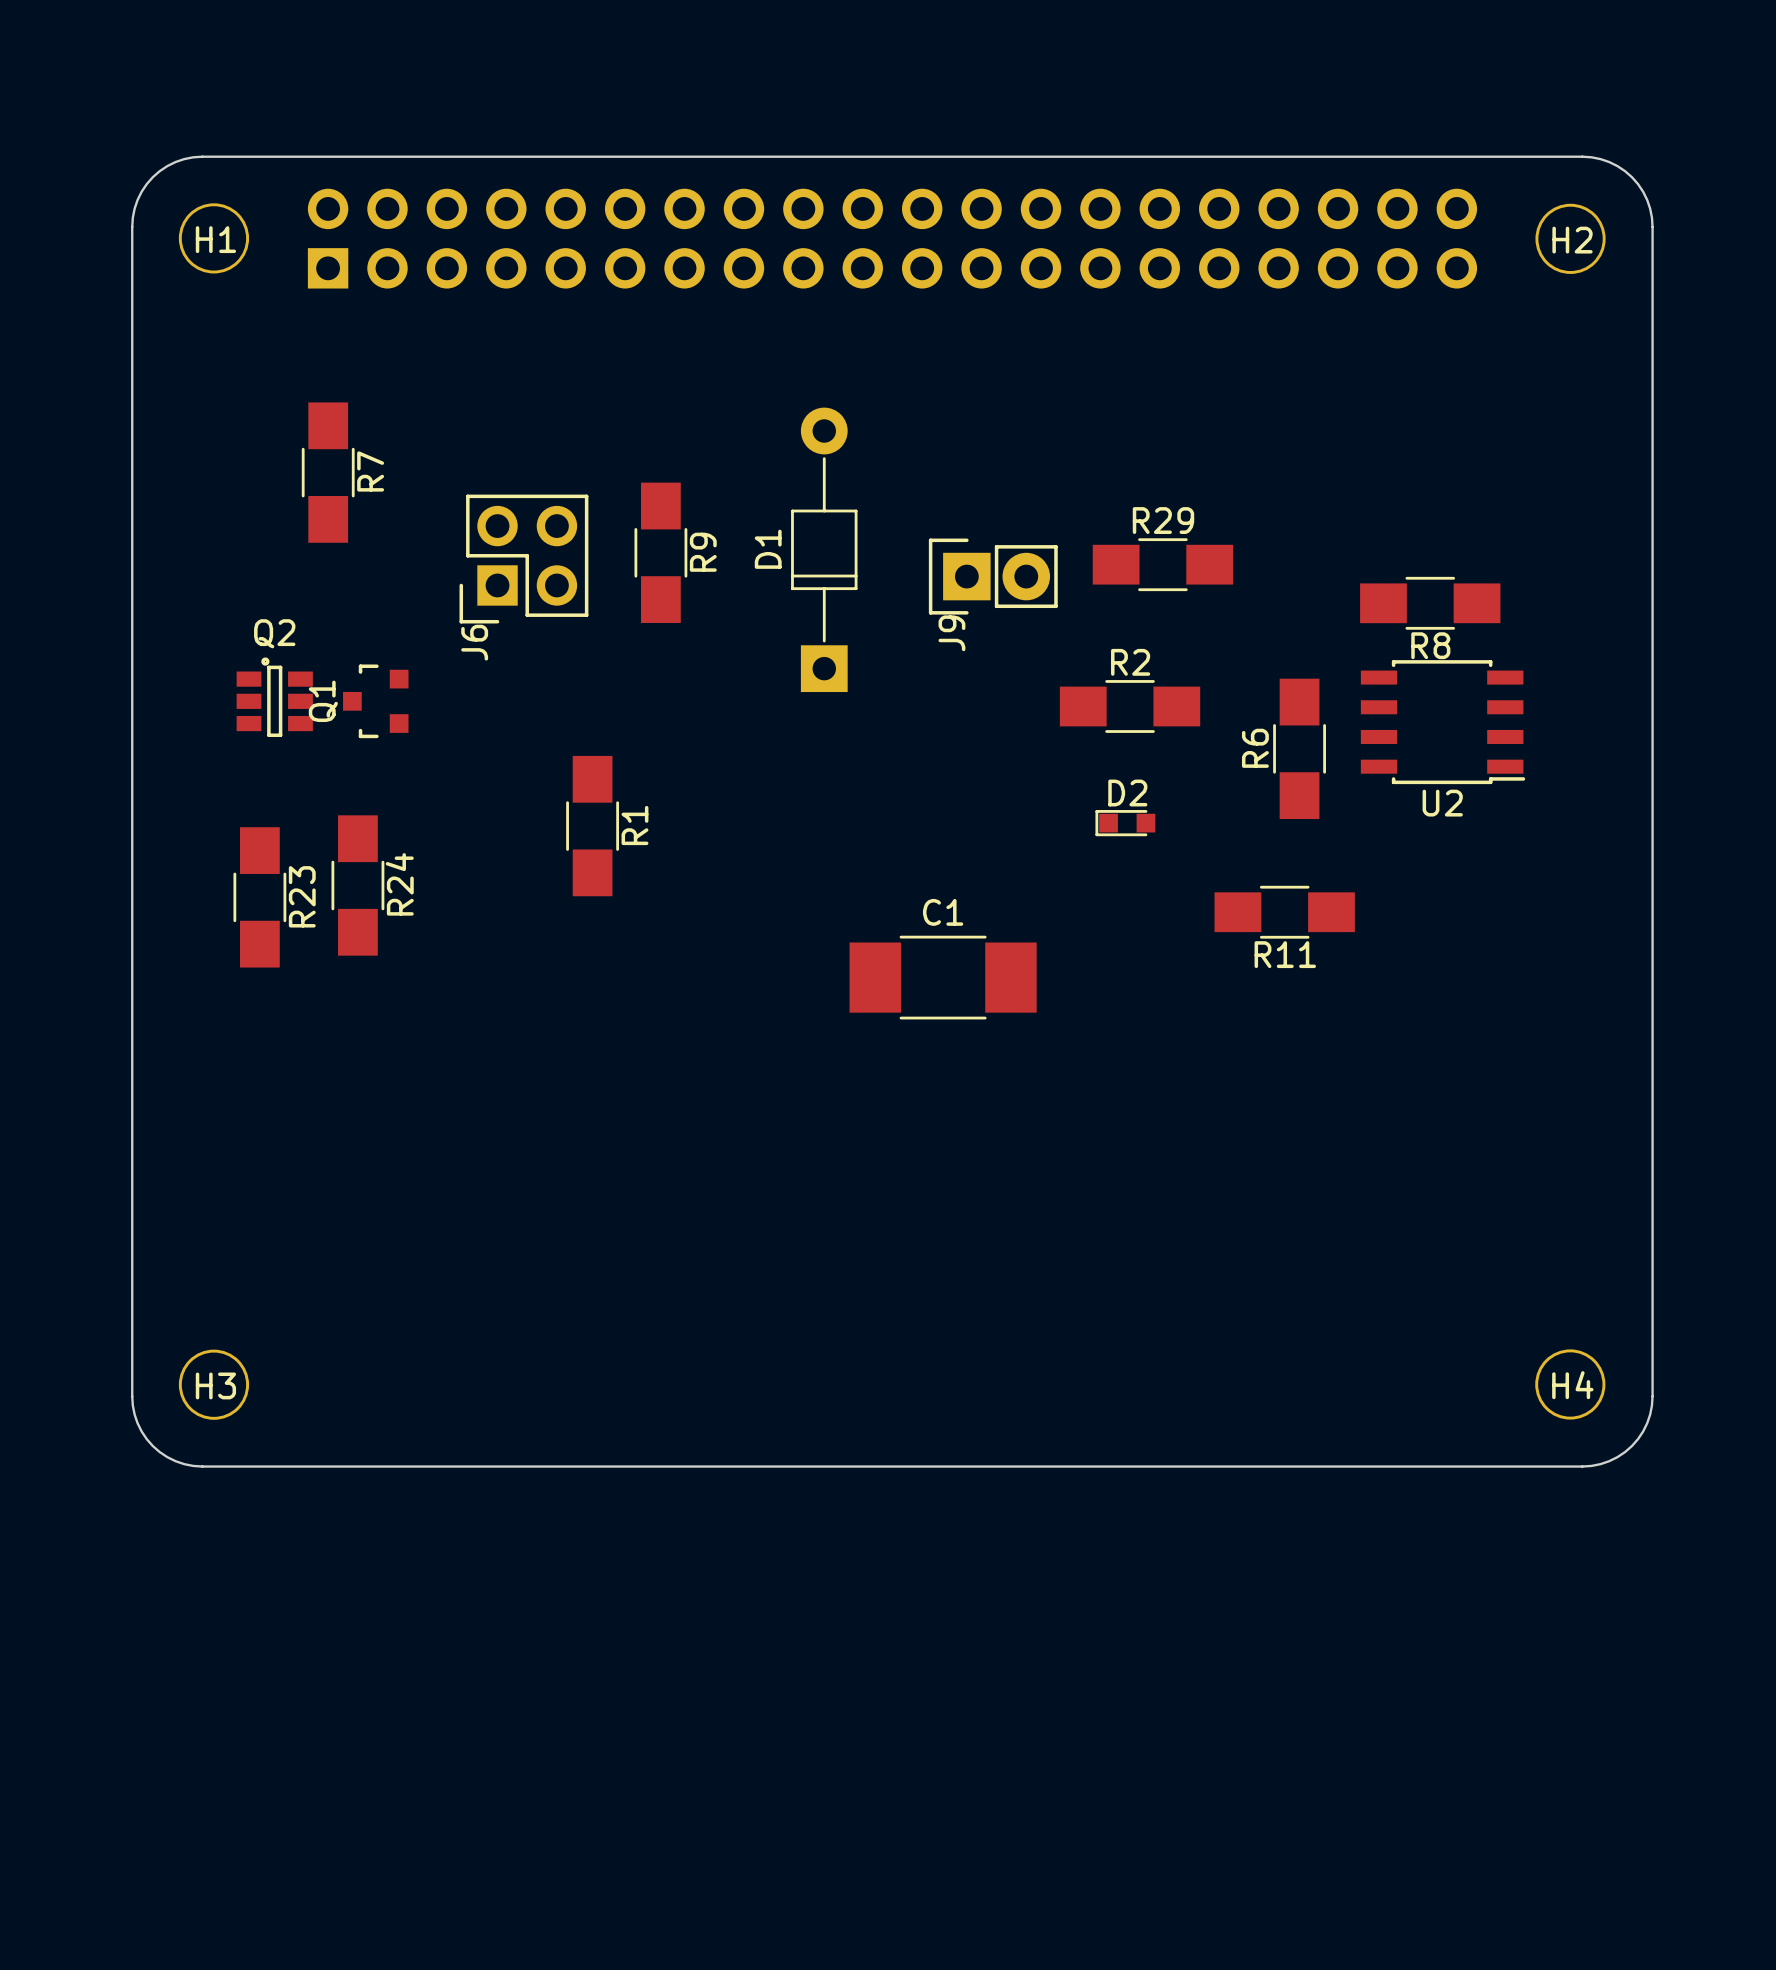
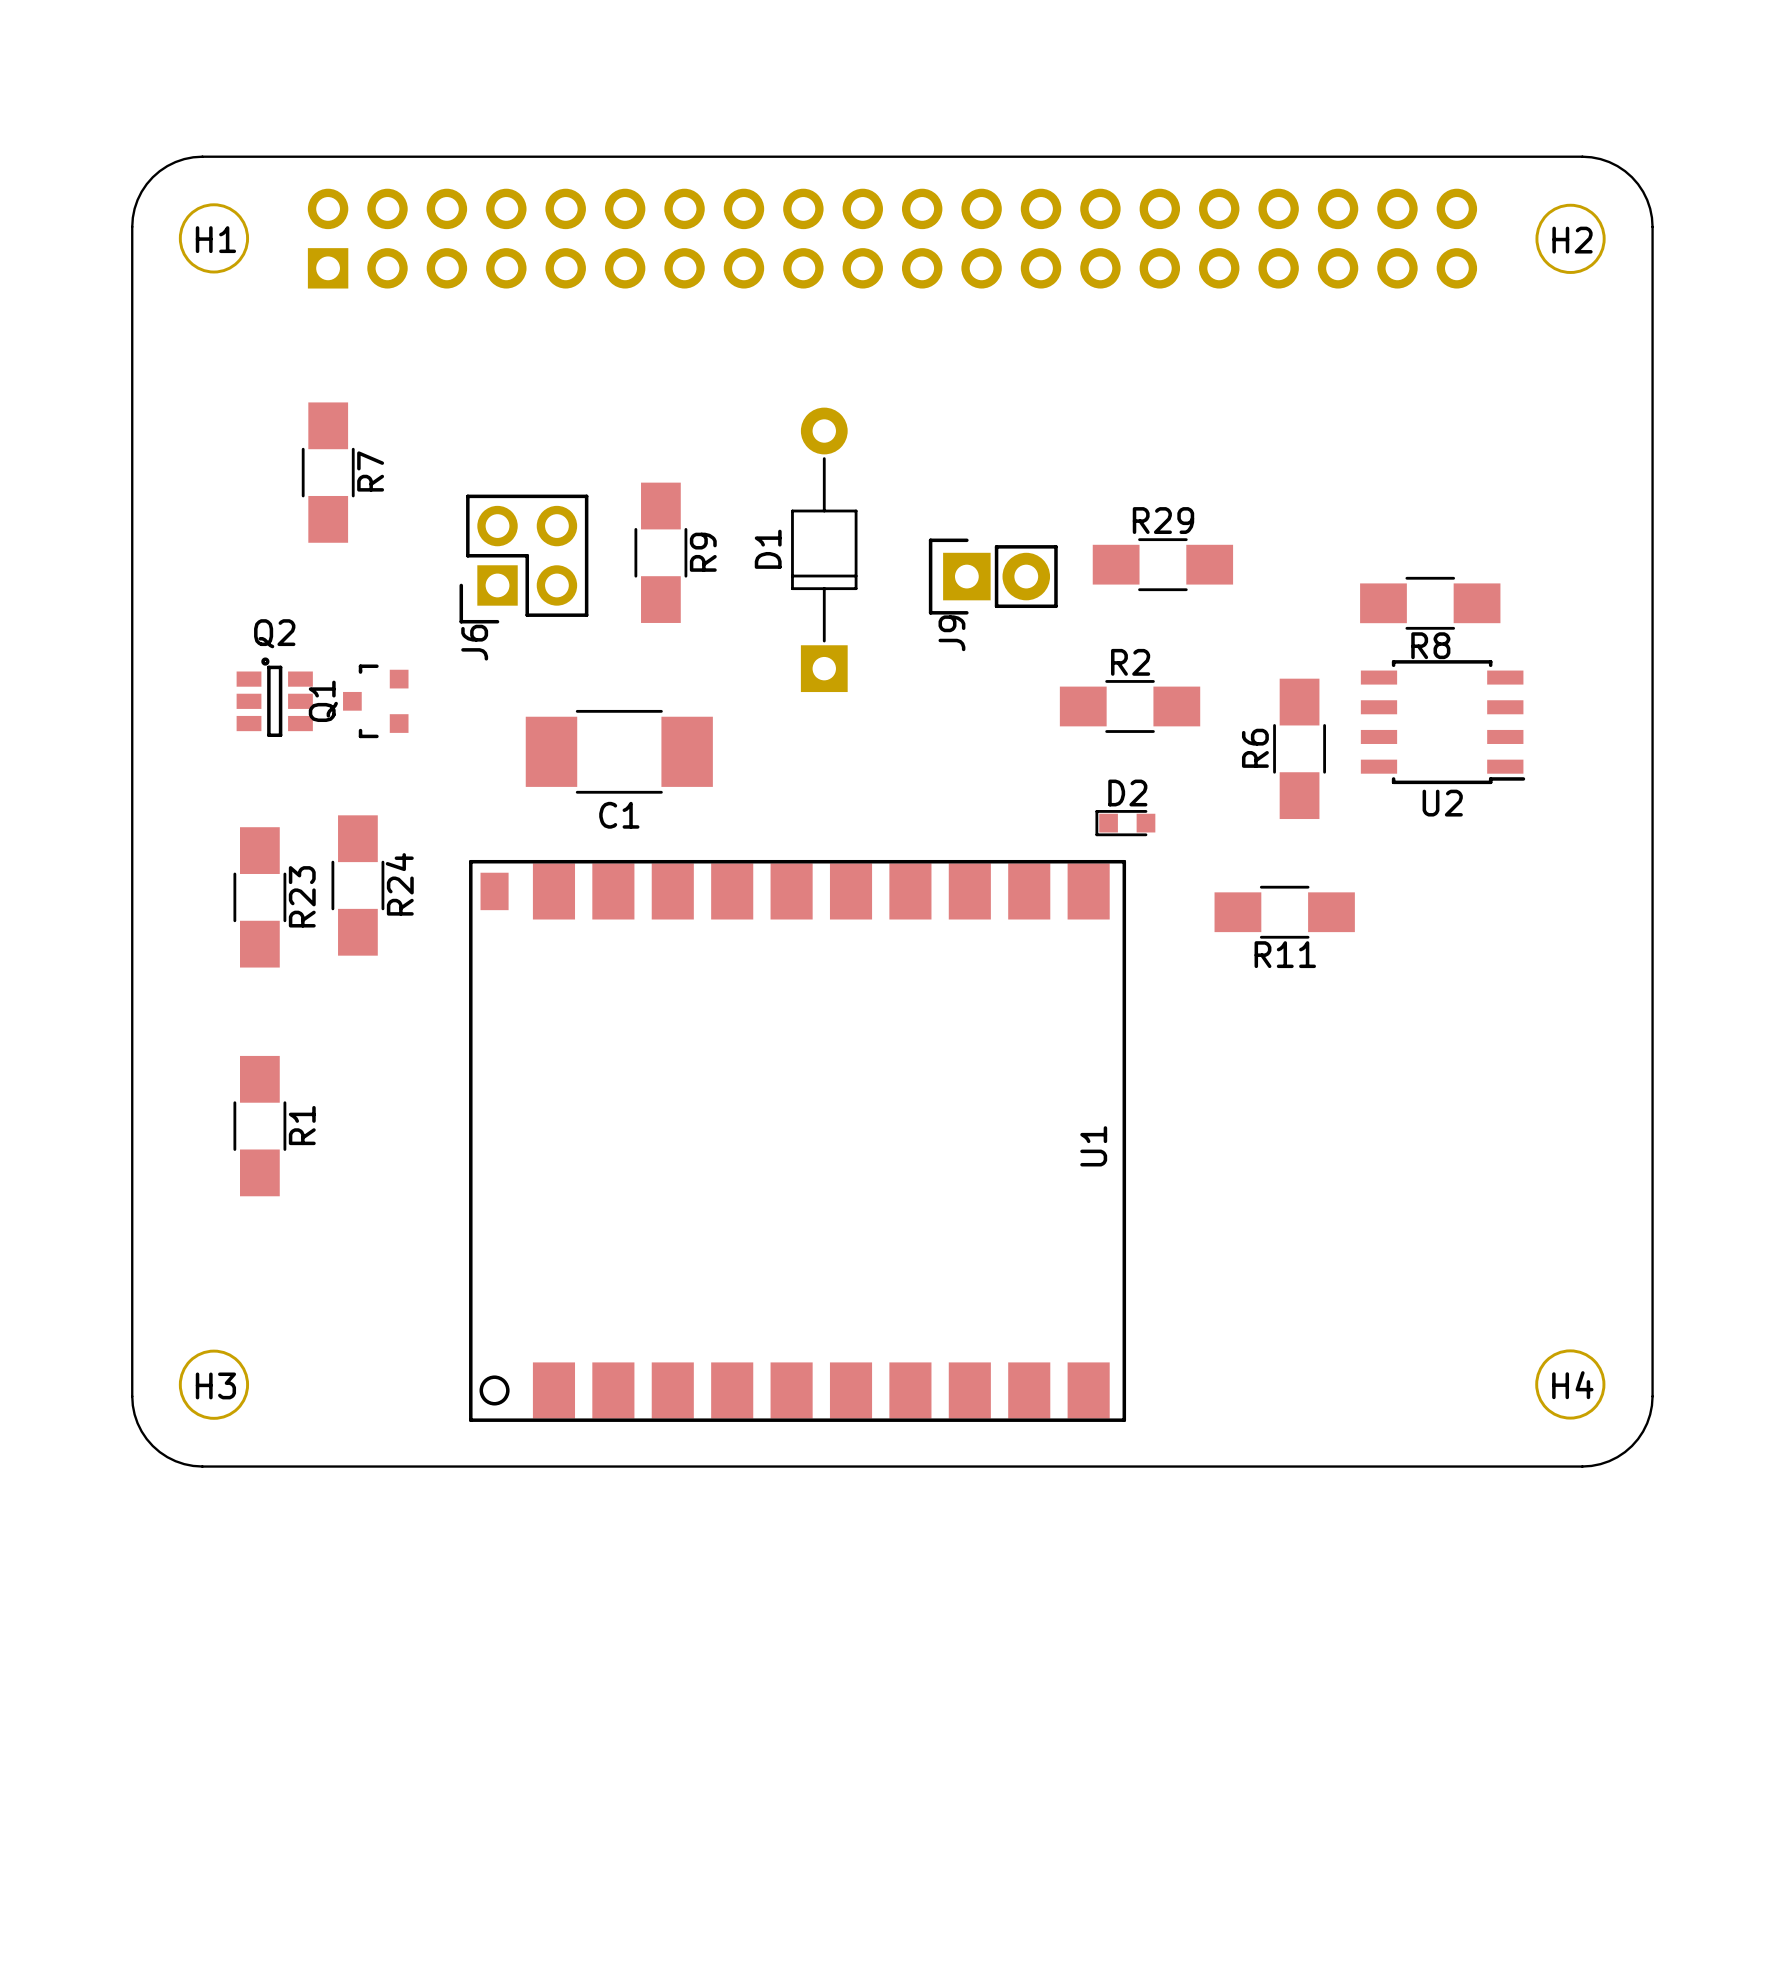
R1 position: (592, 826) -> (259, 1126)
C1 name position: C1 (943, 912) -> C1 (619, 815)
C1 position: (943, 977) -> (619, 751)
U1: none -> (797, 1140)

